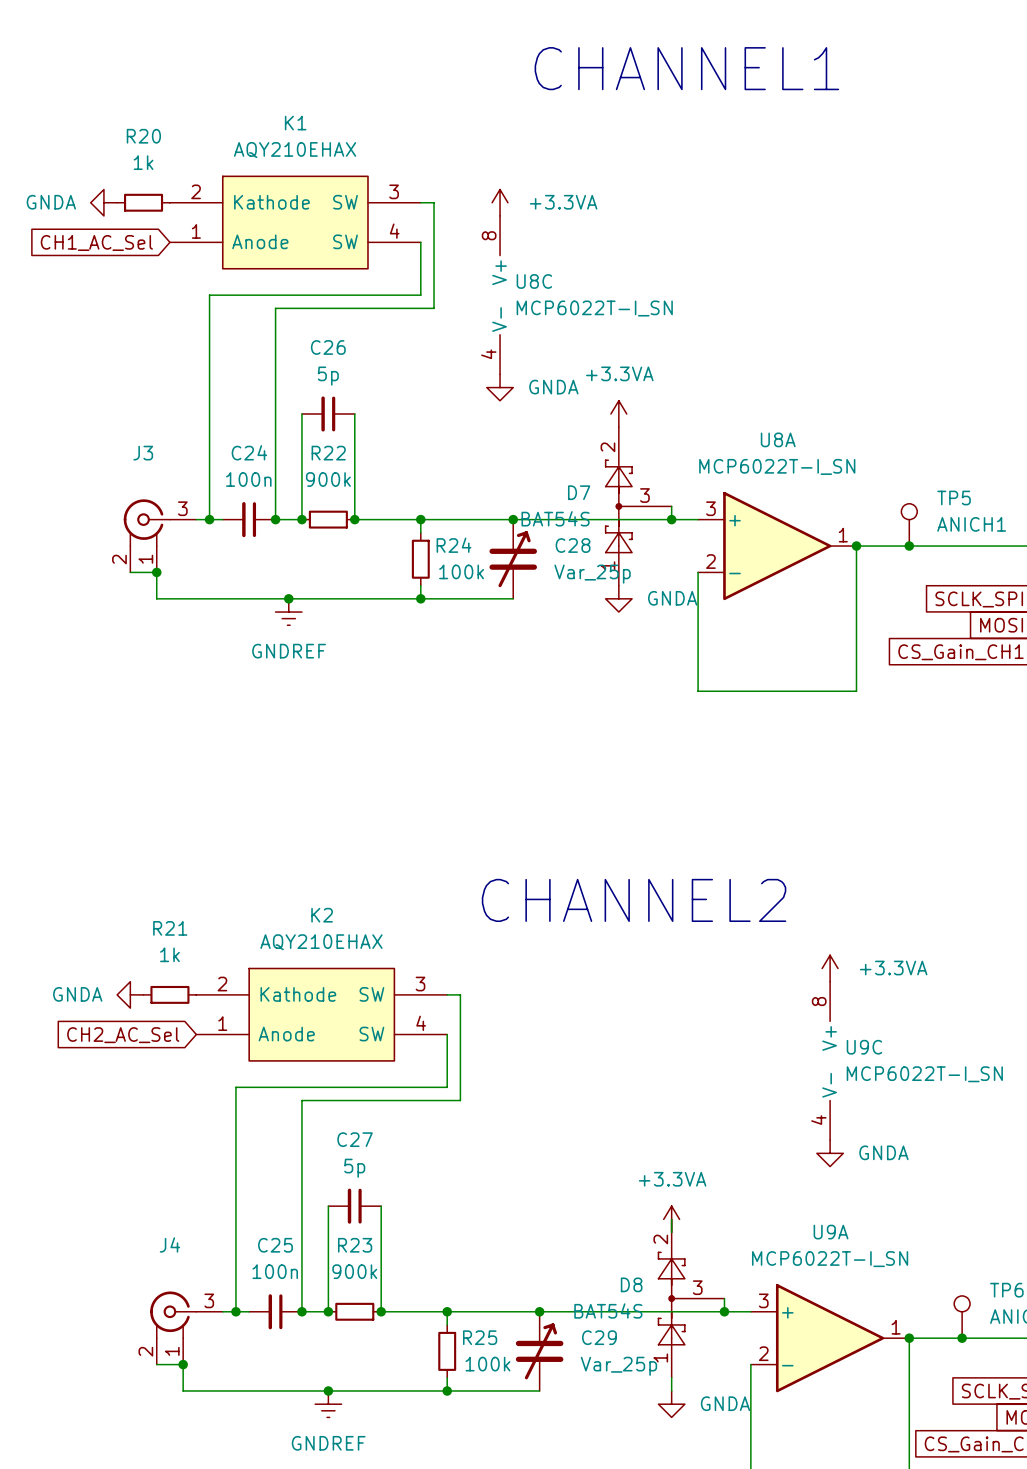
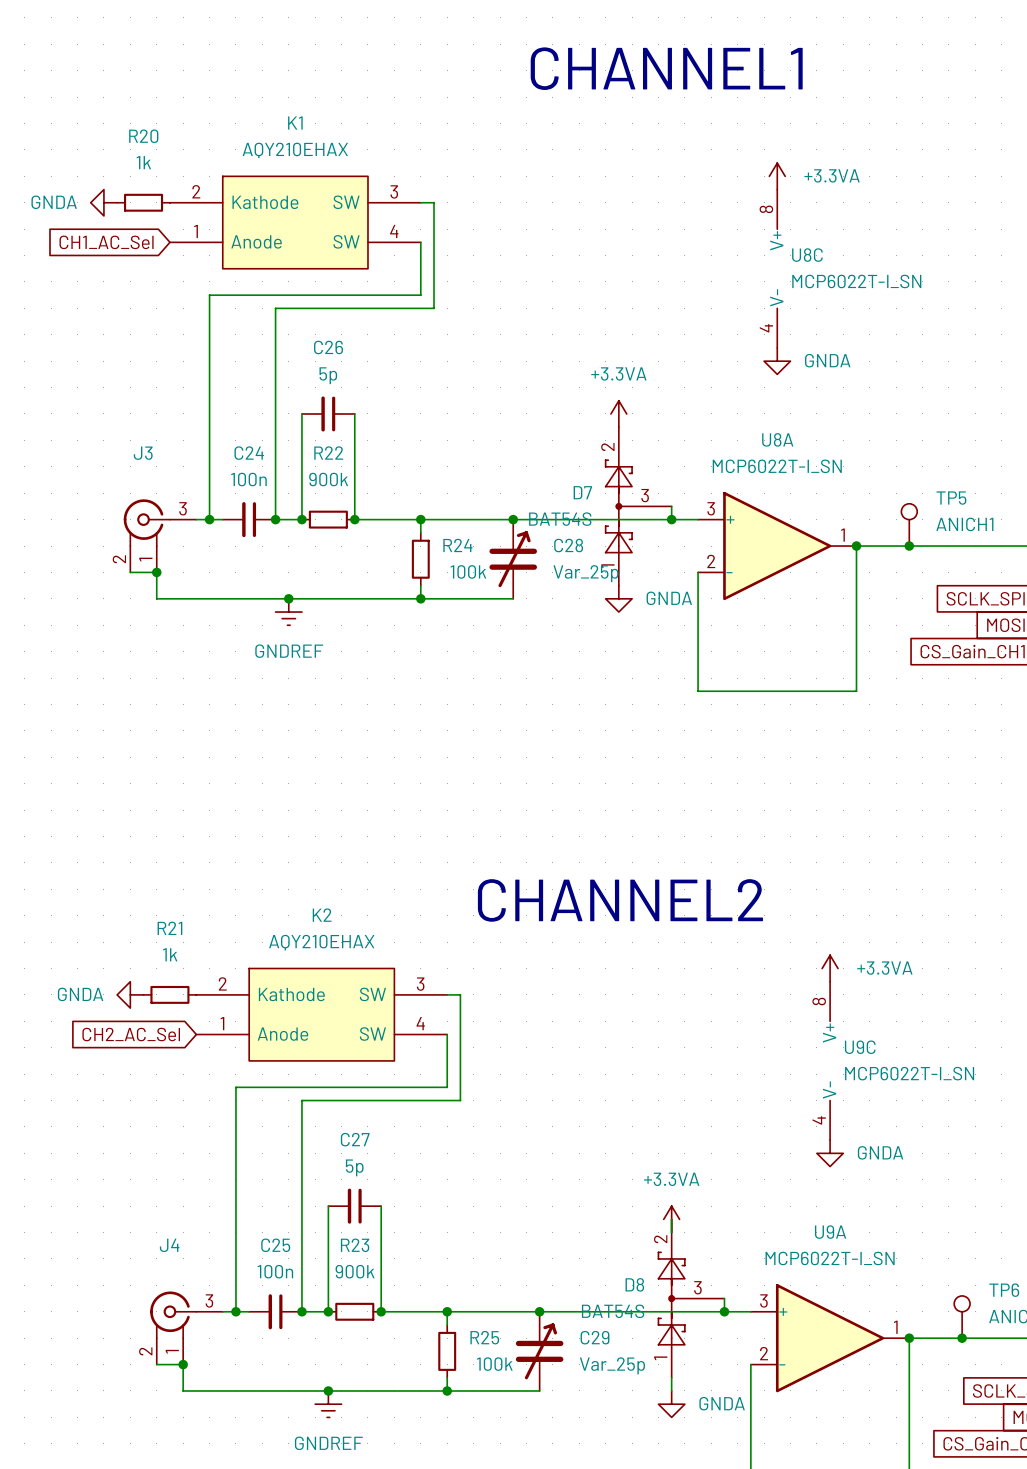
power symbol: none -> +3.3VA (777, 176)
power symbol: +3.3VA (500, 202) -> none
U8C position: (500, 295) -> (777, 268)
power symbol: none -> GNDA (777, 361)
power symbol: GNDA (500, 387) -> none

